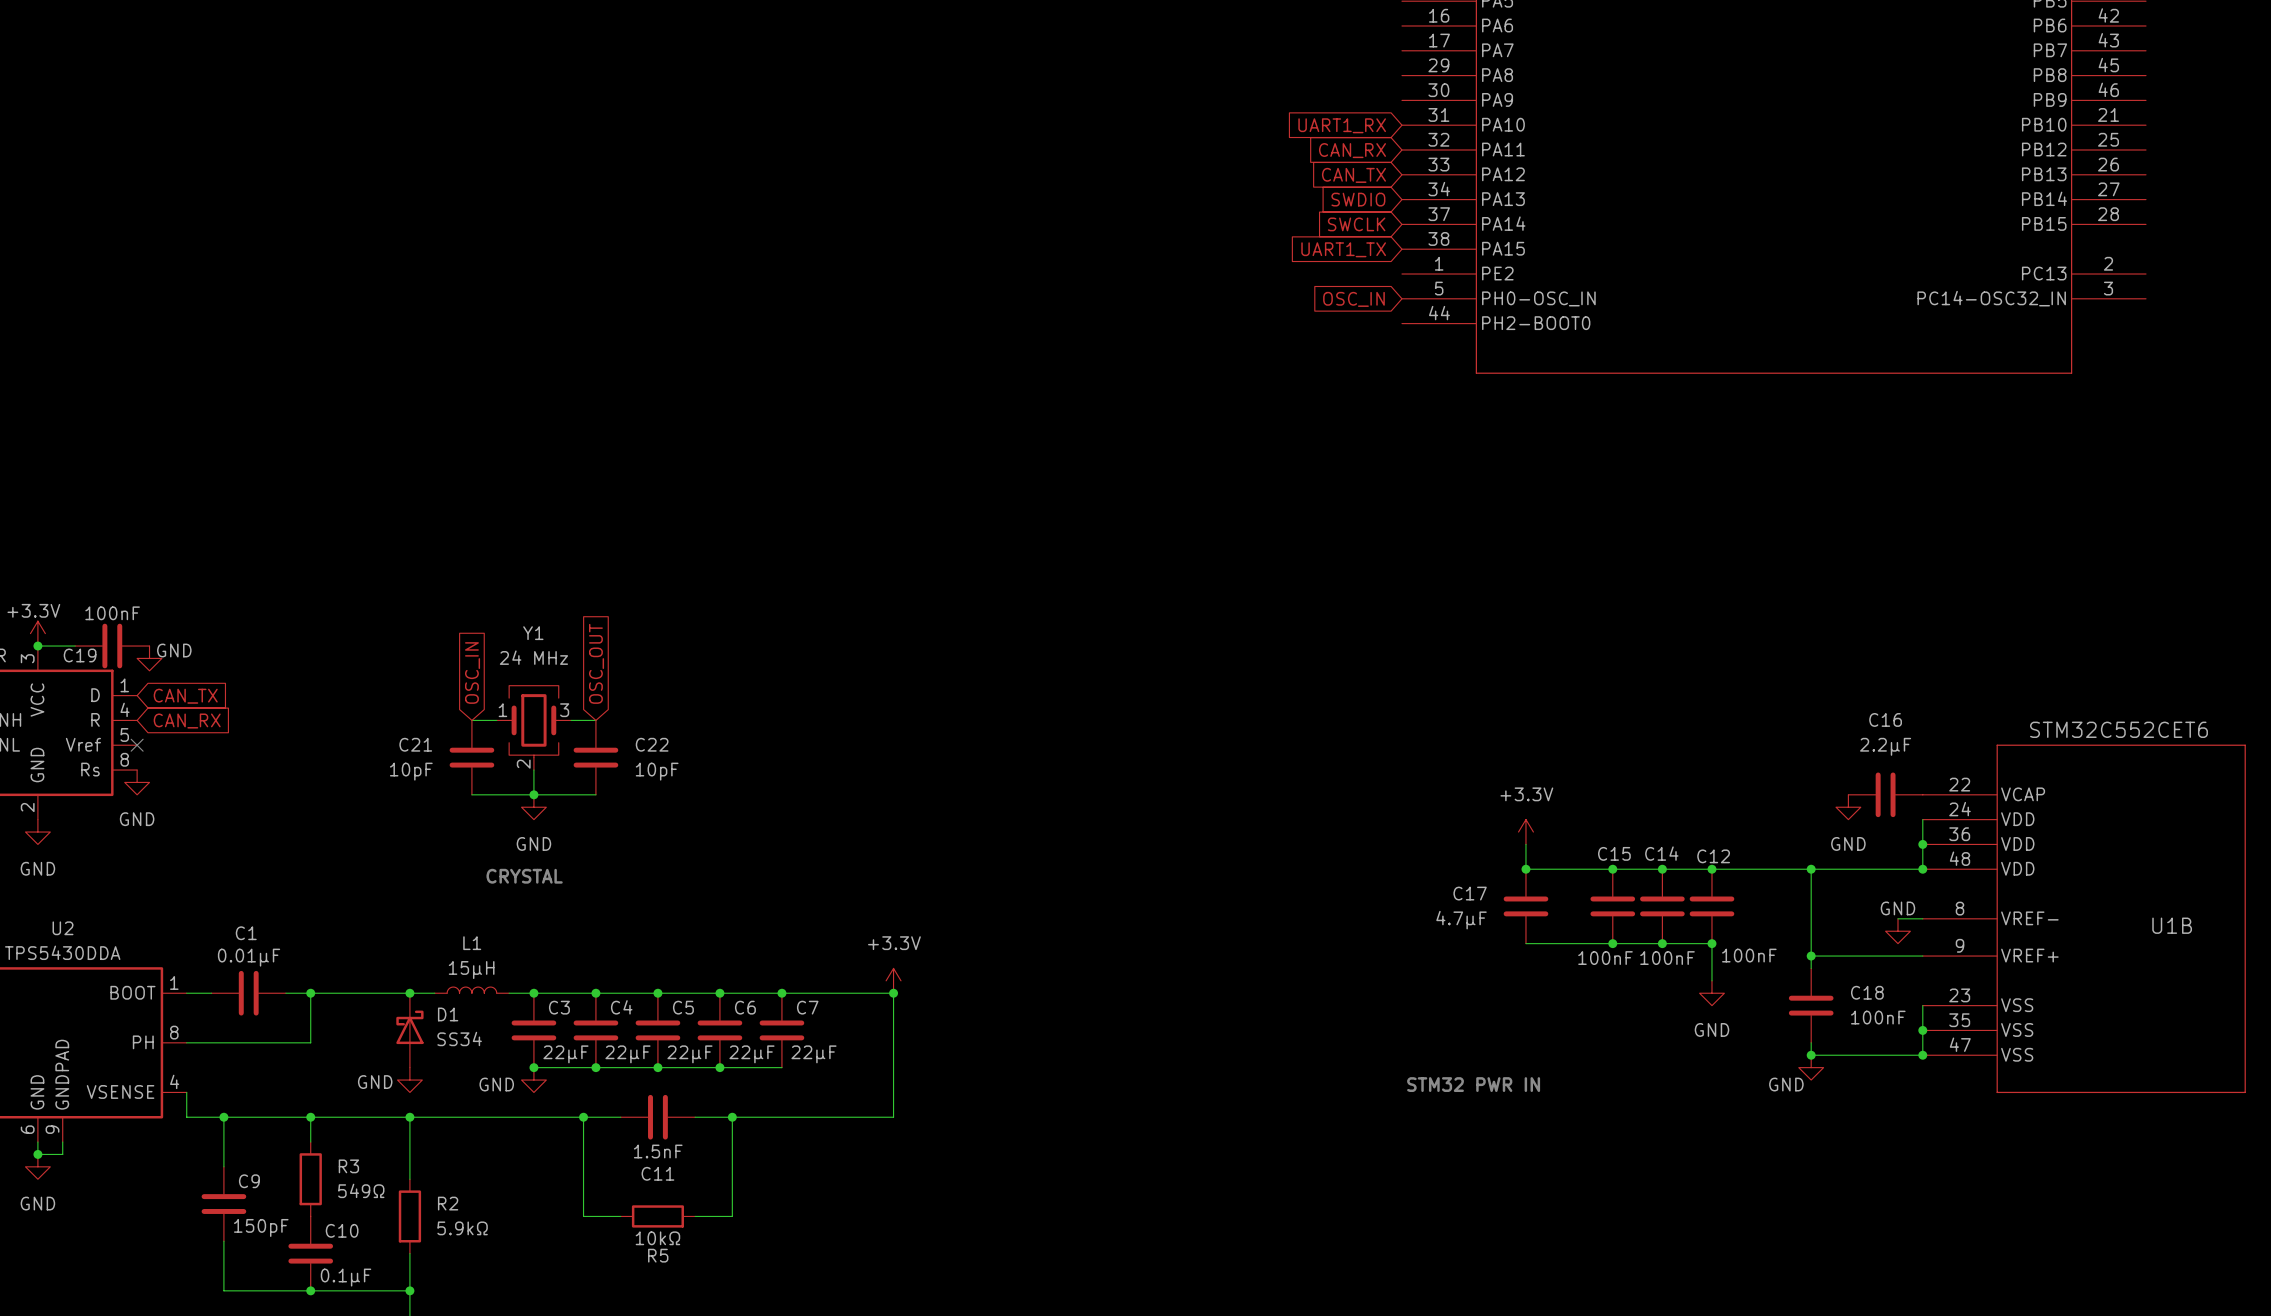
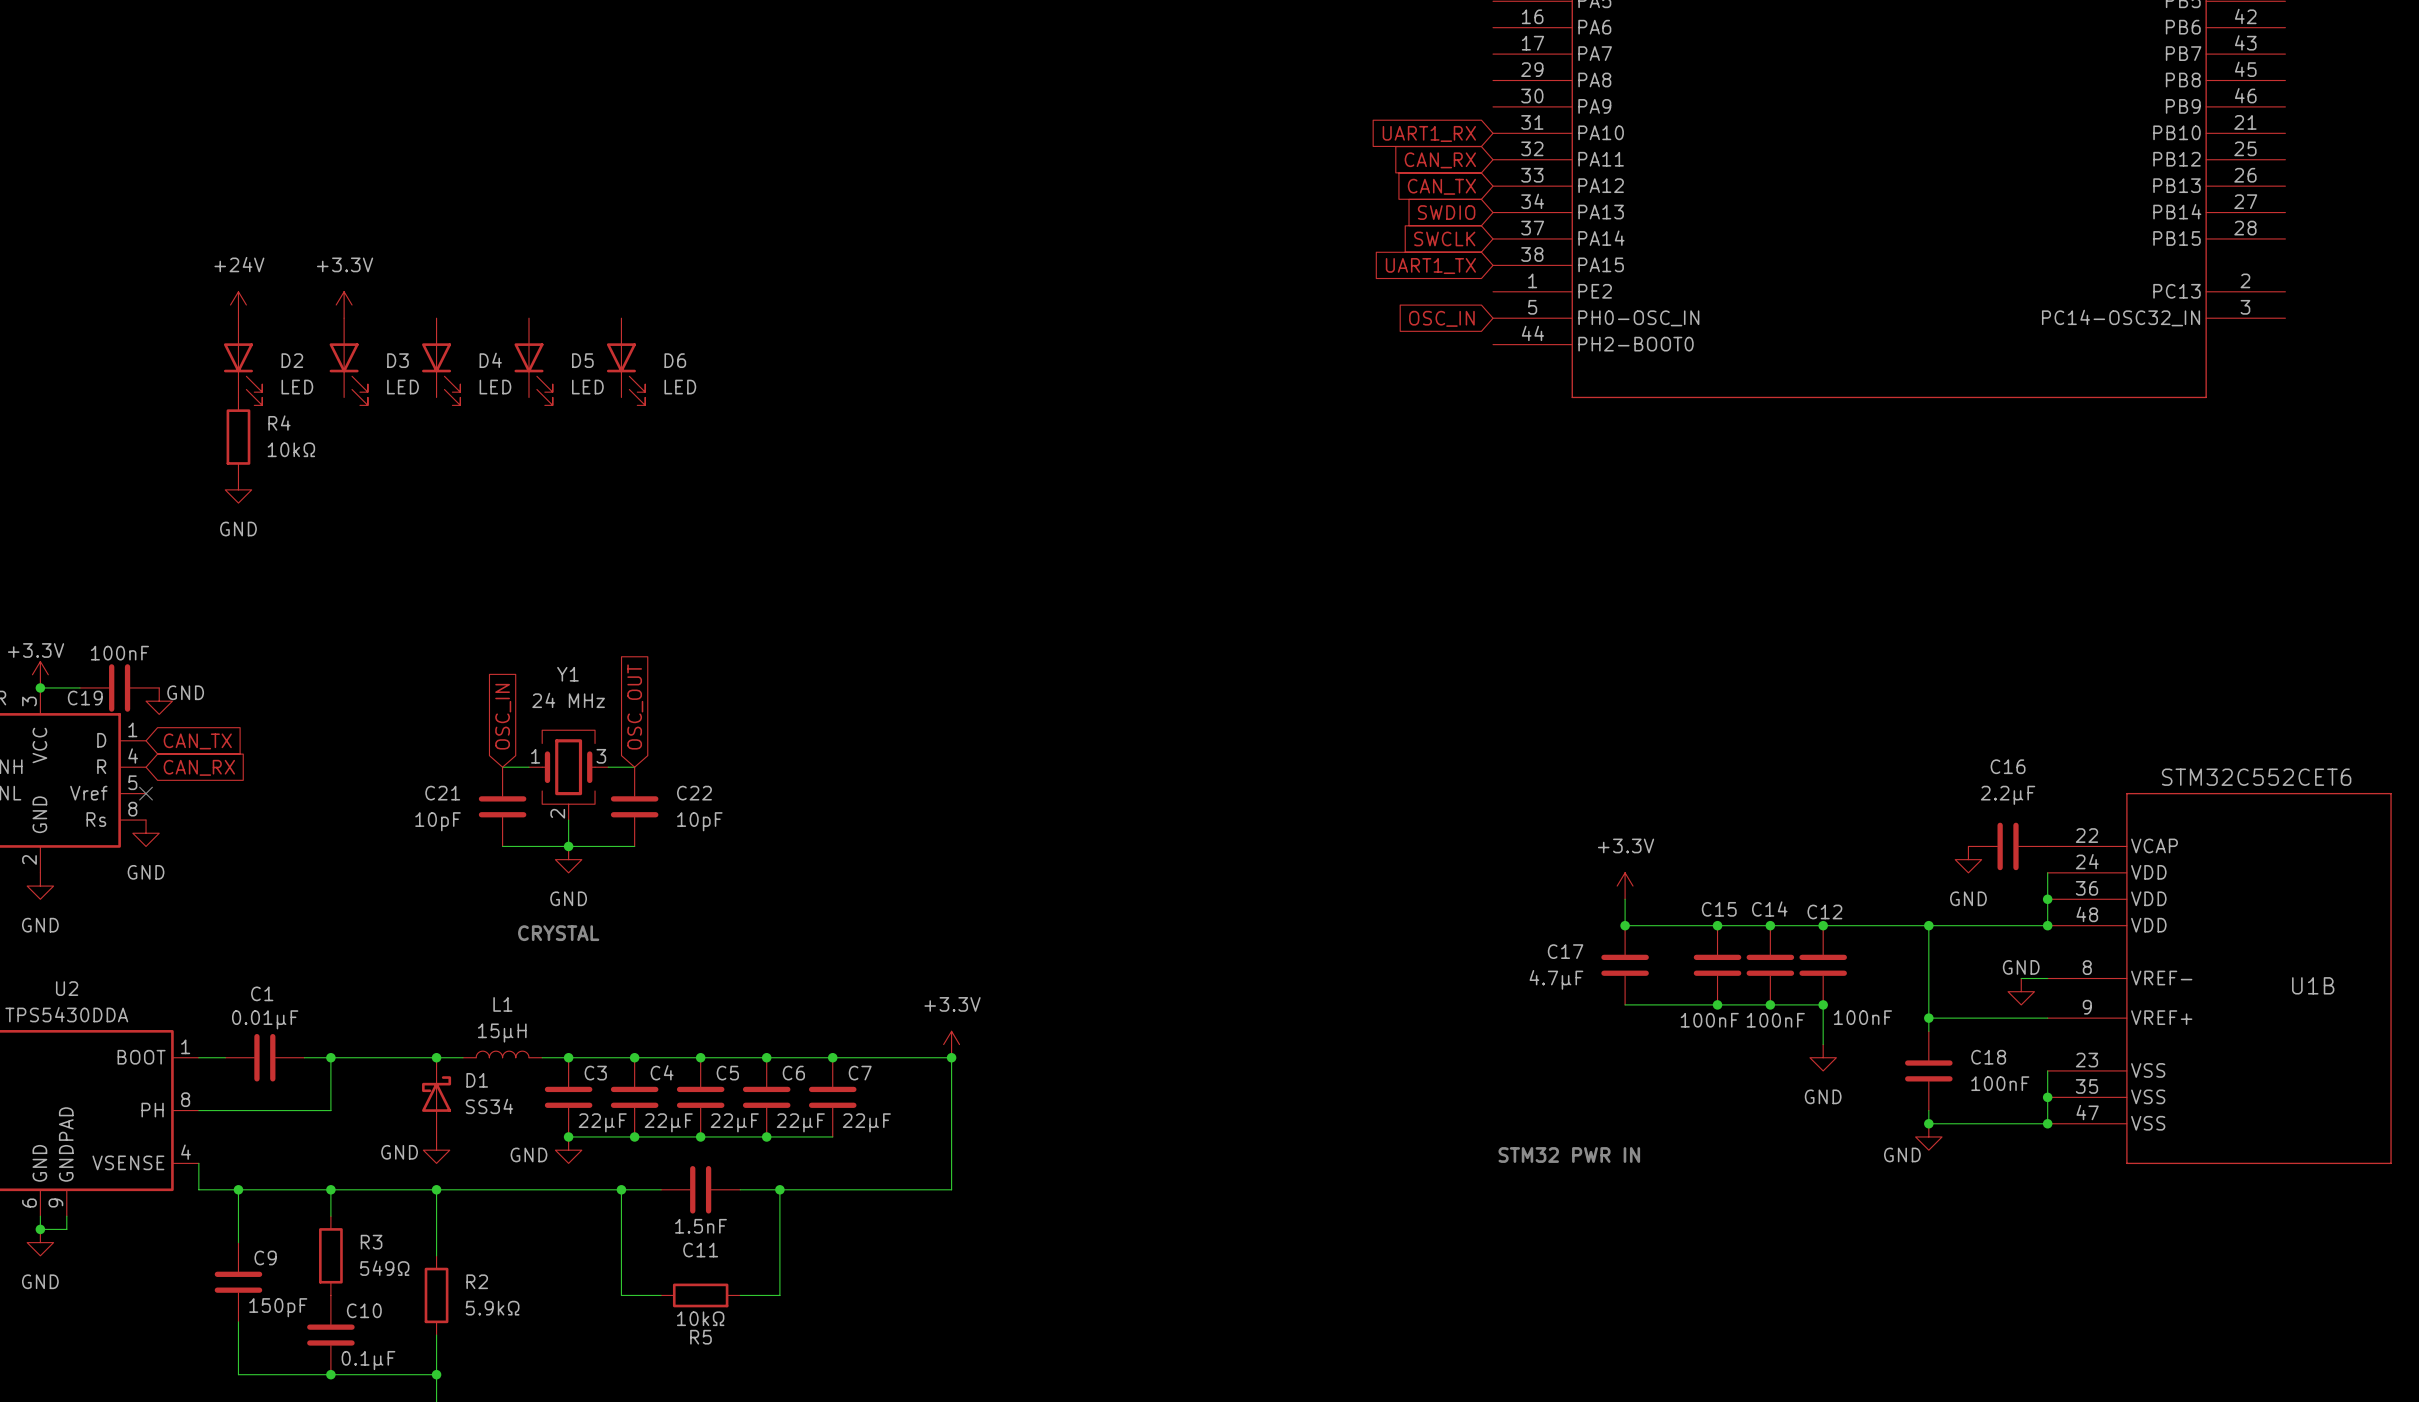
power symbol: none -> +24V (238, 305)
power symbol: none -> +3.3V (344, 305)
D2: none -> LED (243, 361)
D3: none -> LED (348, 361)
D4: none -> LED (441, 361)
D5: none -> LED (533, 361)
D6: none -> LED (626, 361)
R4: none -> 10kΩ (238, 437)
power symbol: none -> GND (238, 489)

